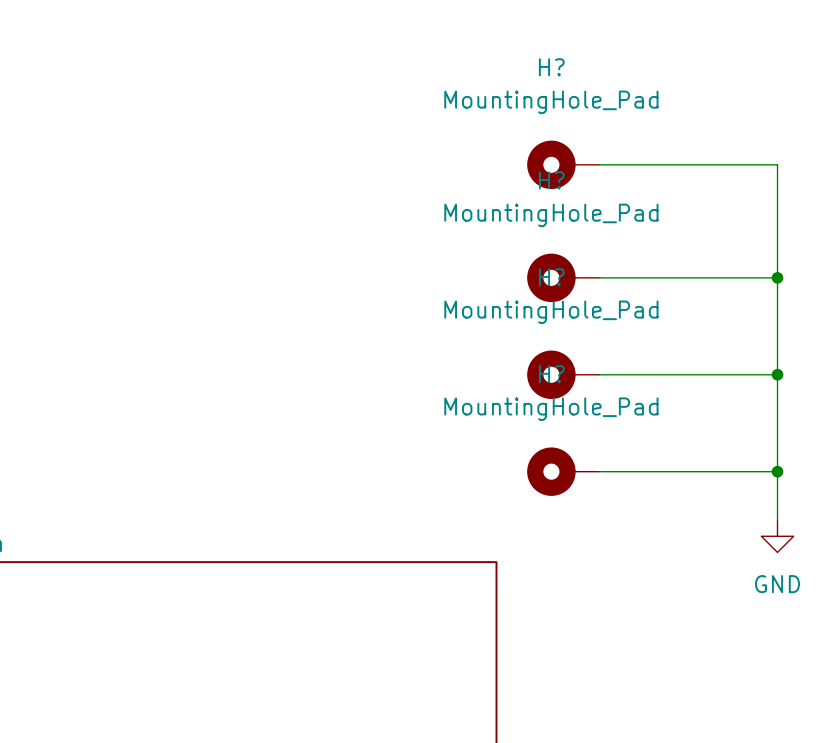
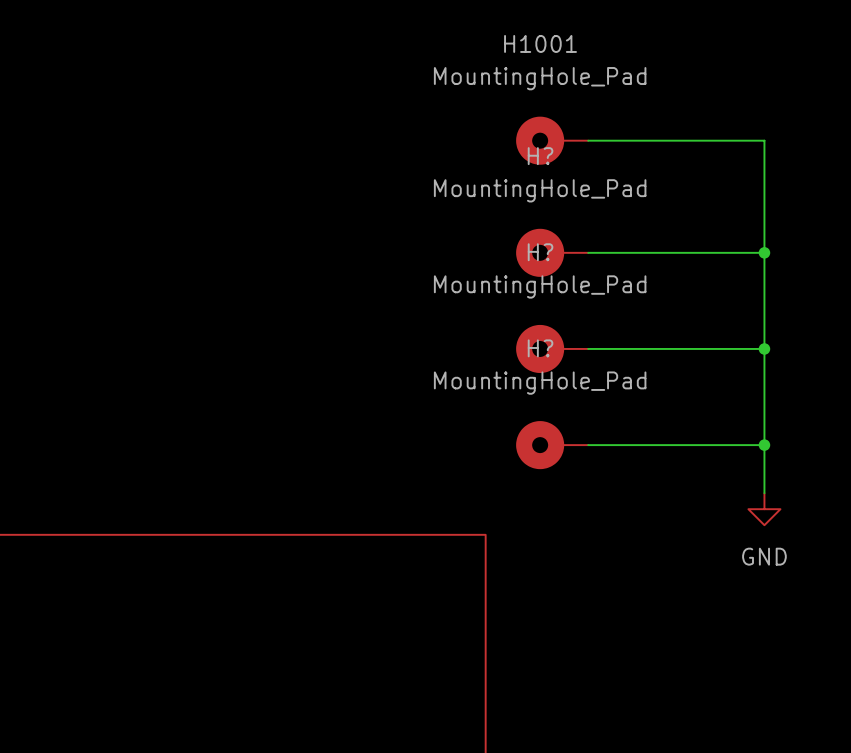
H? name: H? (551, 67) -> H1001 (540, 43)

